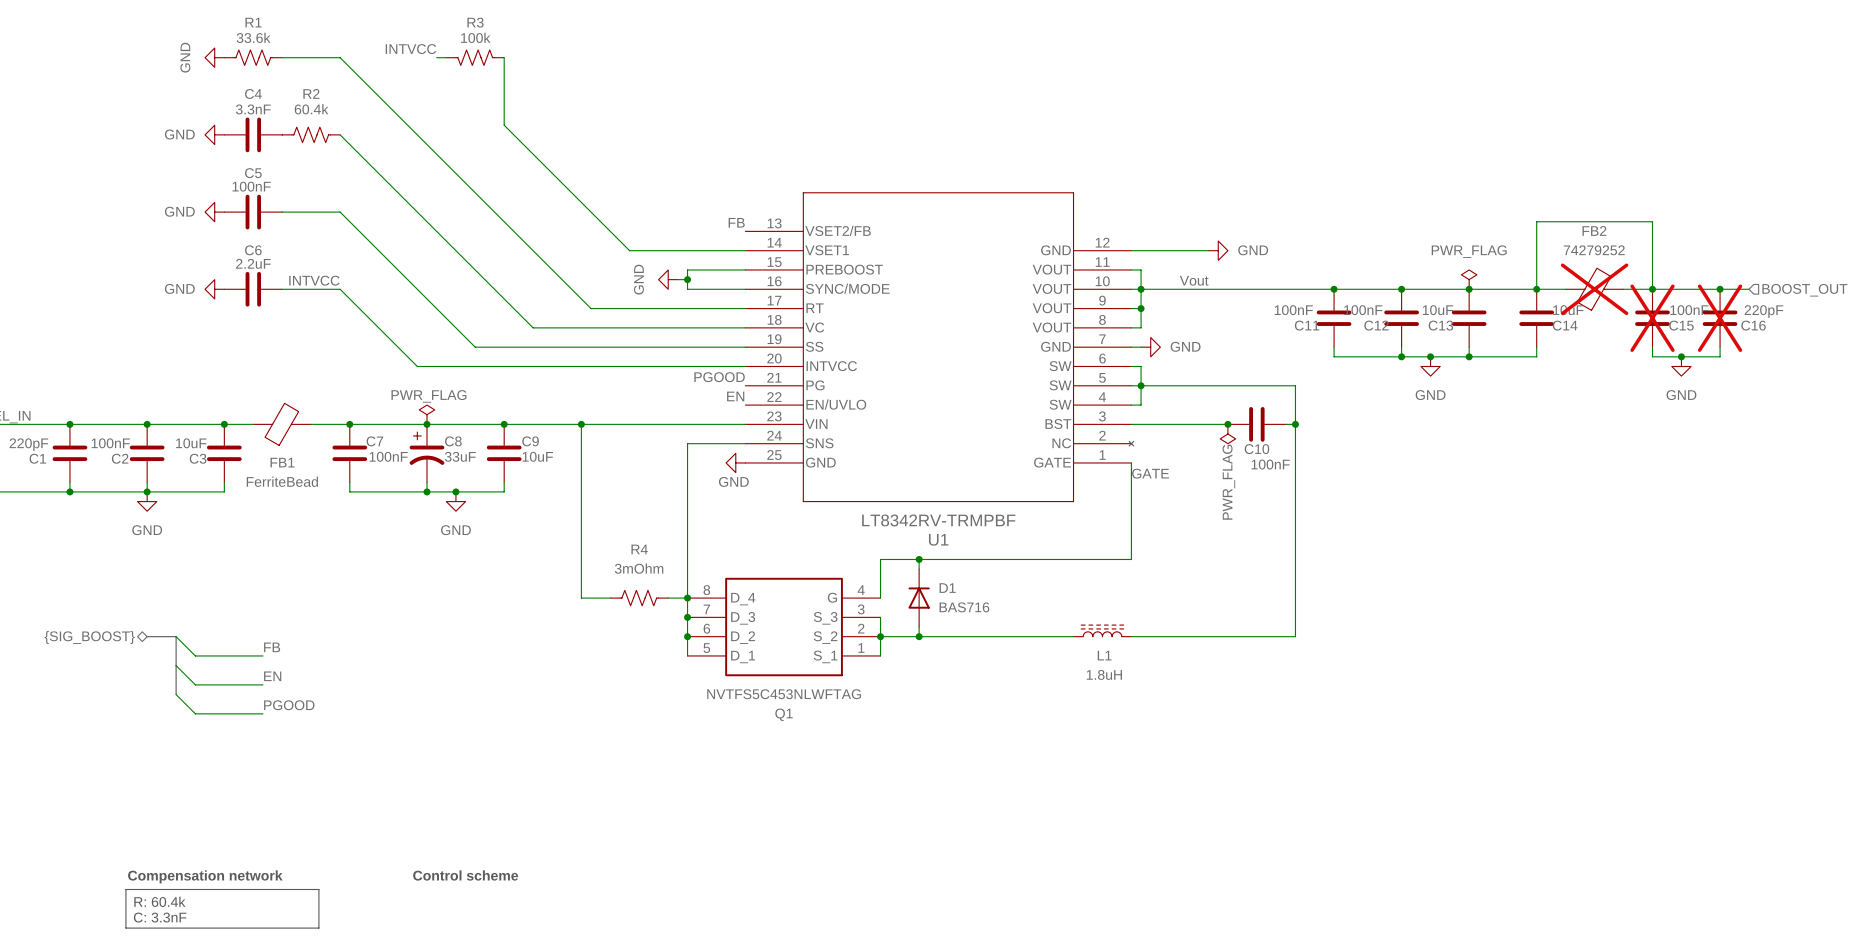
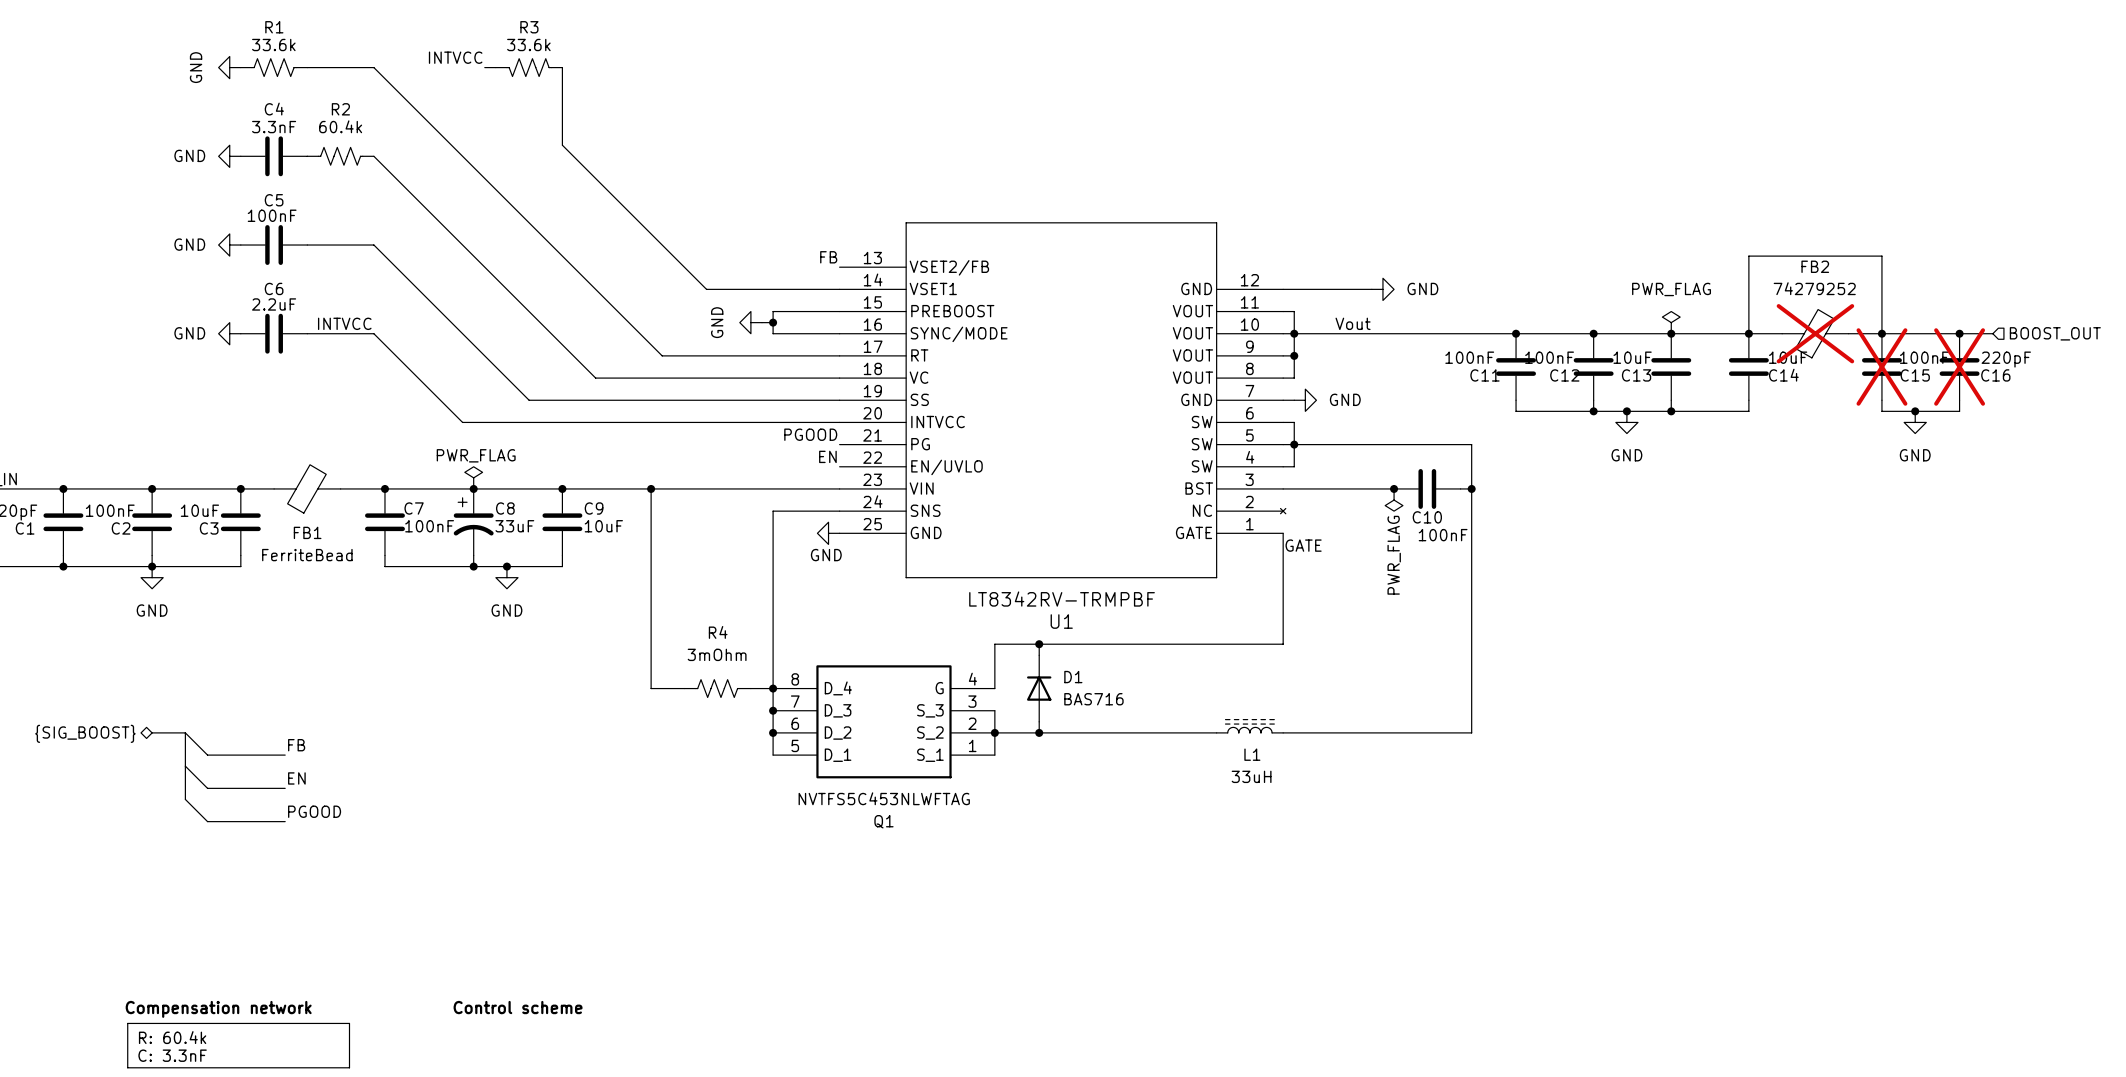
R3 value: 100k (475, 37) -> 33.6k (528, 45)
L1 value: 1.8uH (1104, 674) -> 33uH (1251, 776)

